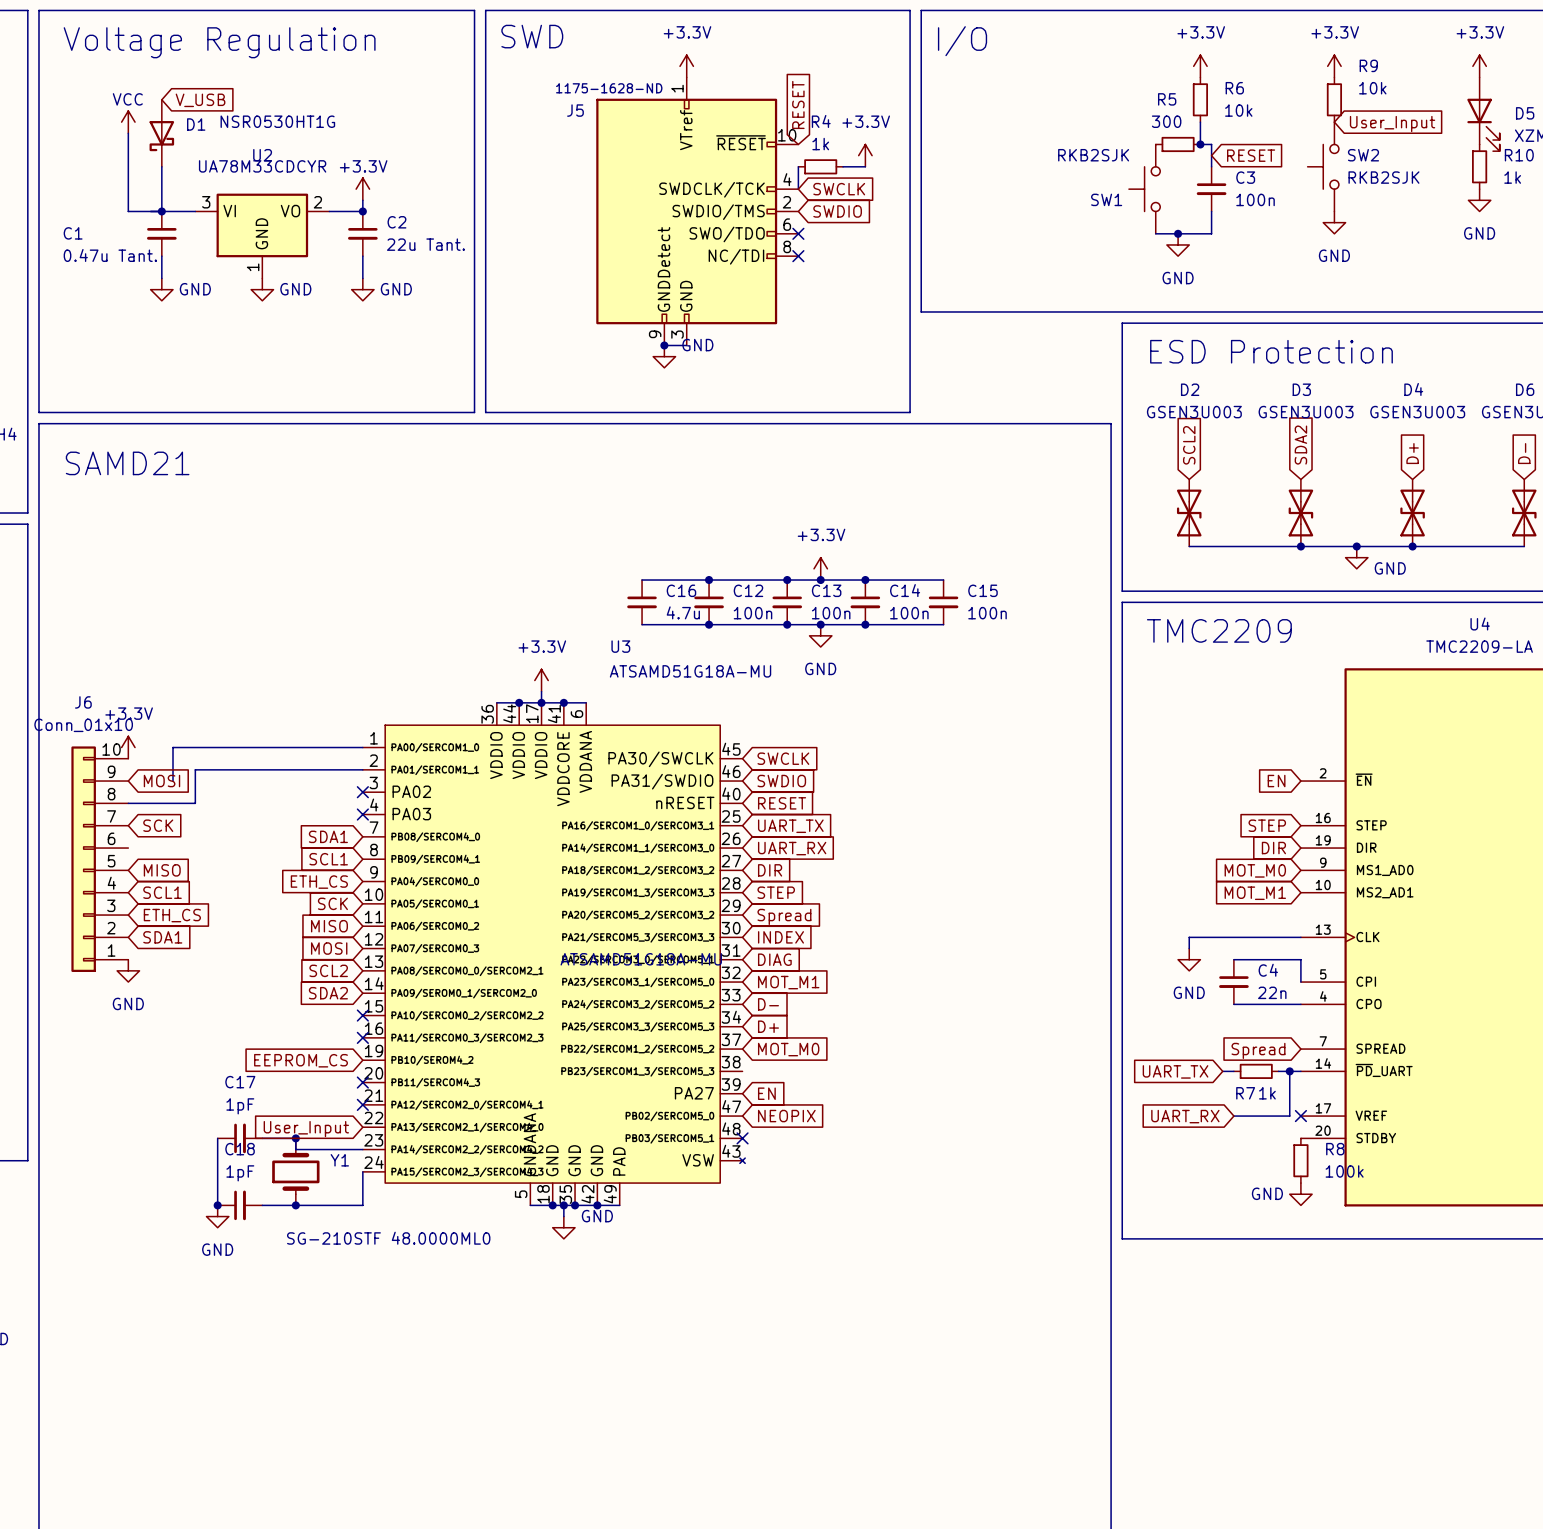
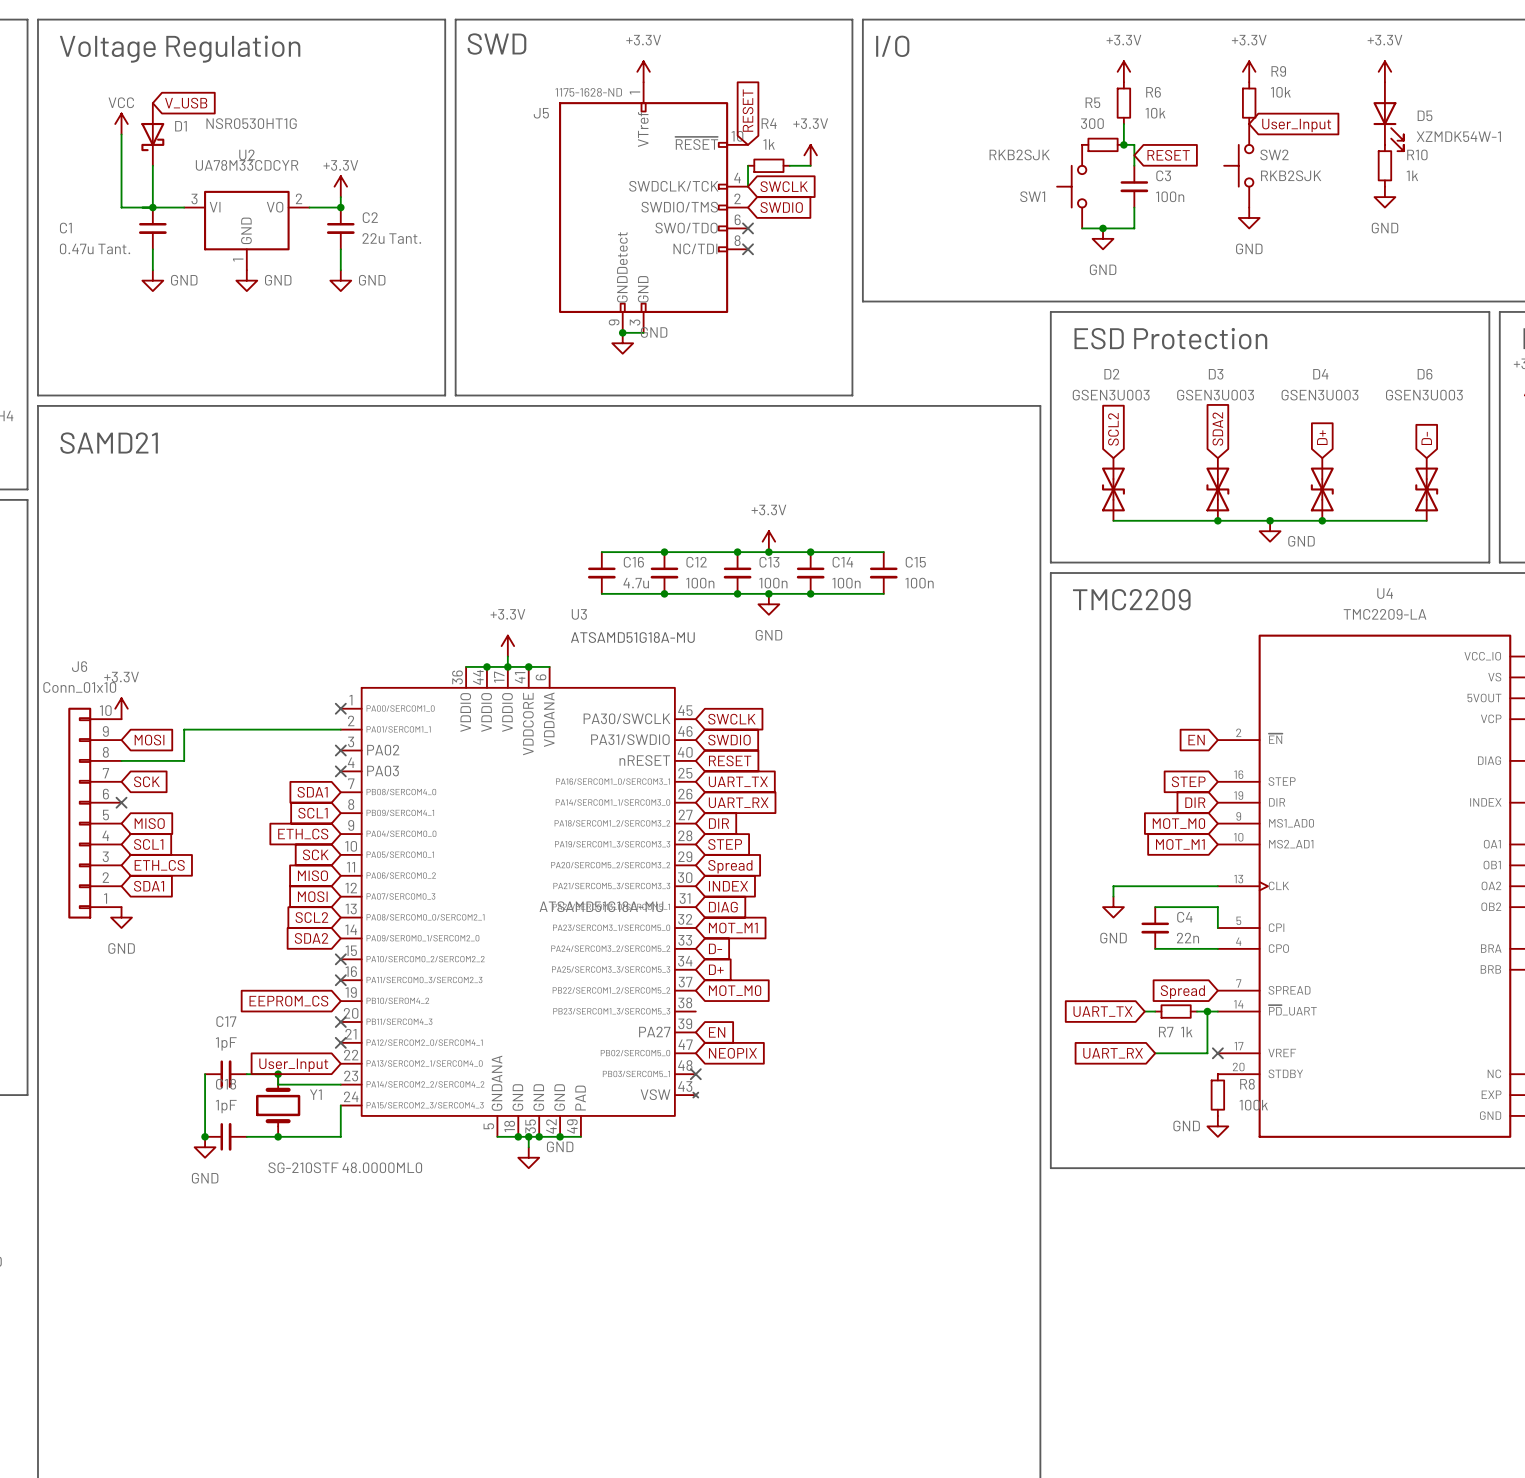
wire: (362, 747) (173, 747) (173, 781) -> none
no-connect mark: none -> (340, 708)
no-connect mark: none -> (121, 802)

